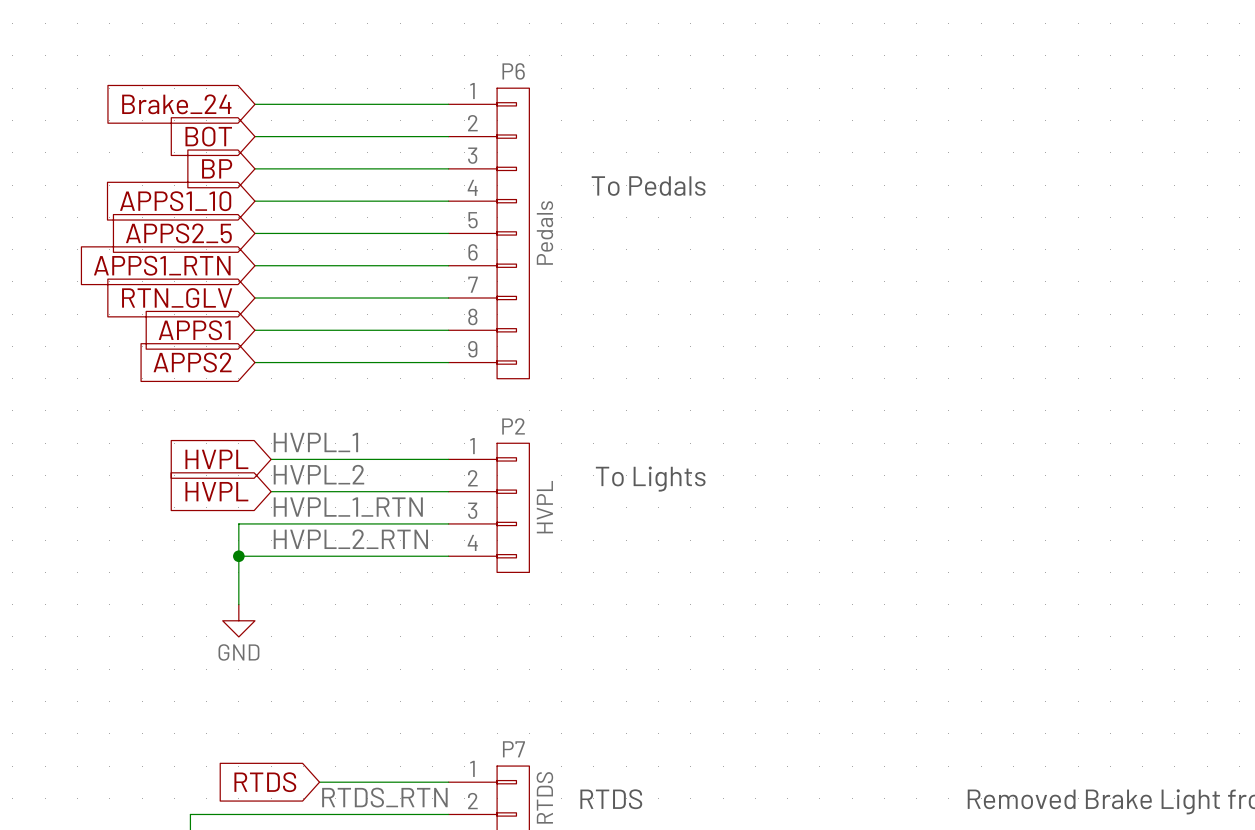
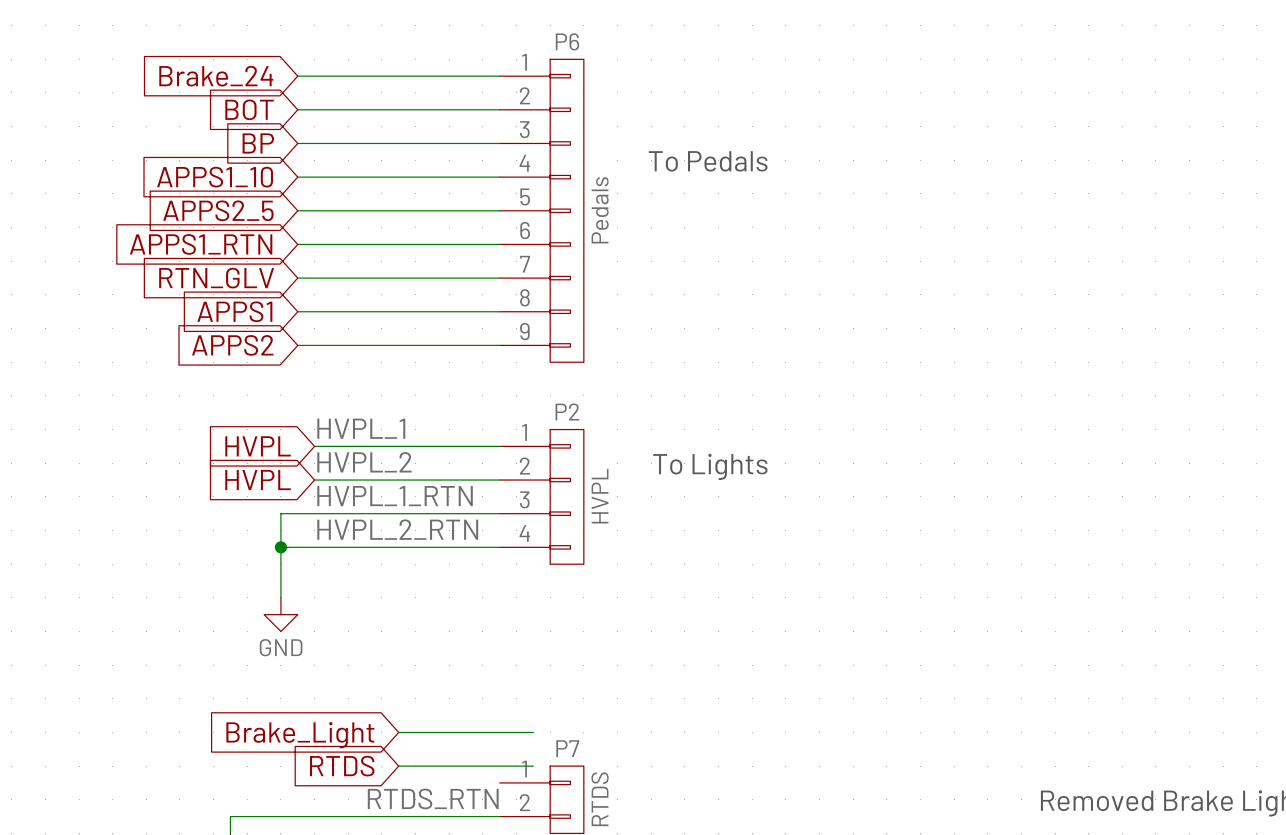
wire: none -> (398, 732) (533, 732)
global label: none -> Brake_Light (300, 735)
global label position: RTDS (265, 782) -> RTDS (342, 766)
wire: (319, 782) (448, 782) -> (398, 766) (533, 766)
text: RTDS (611, 799) -> none

